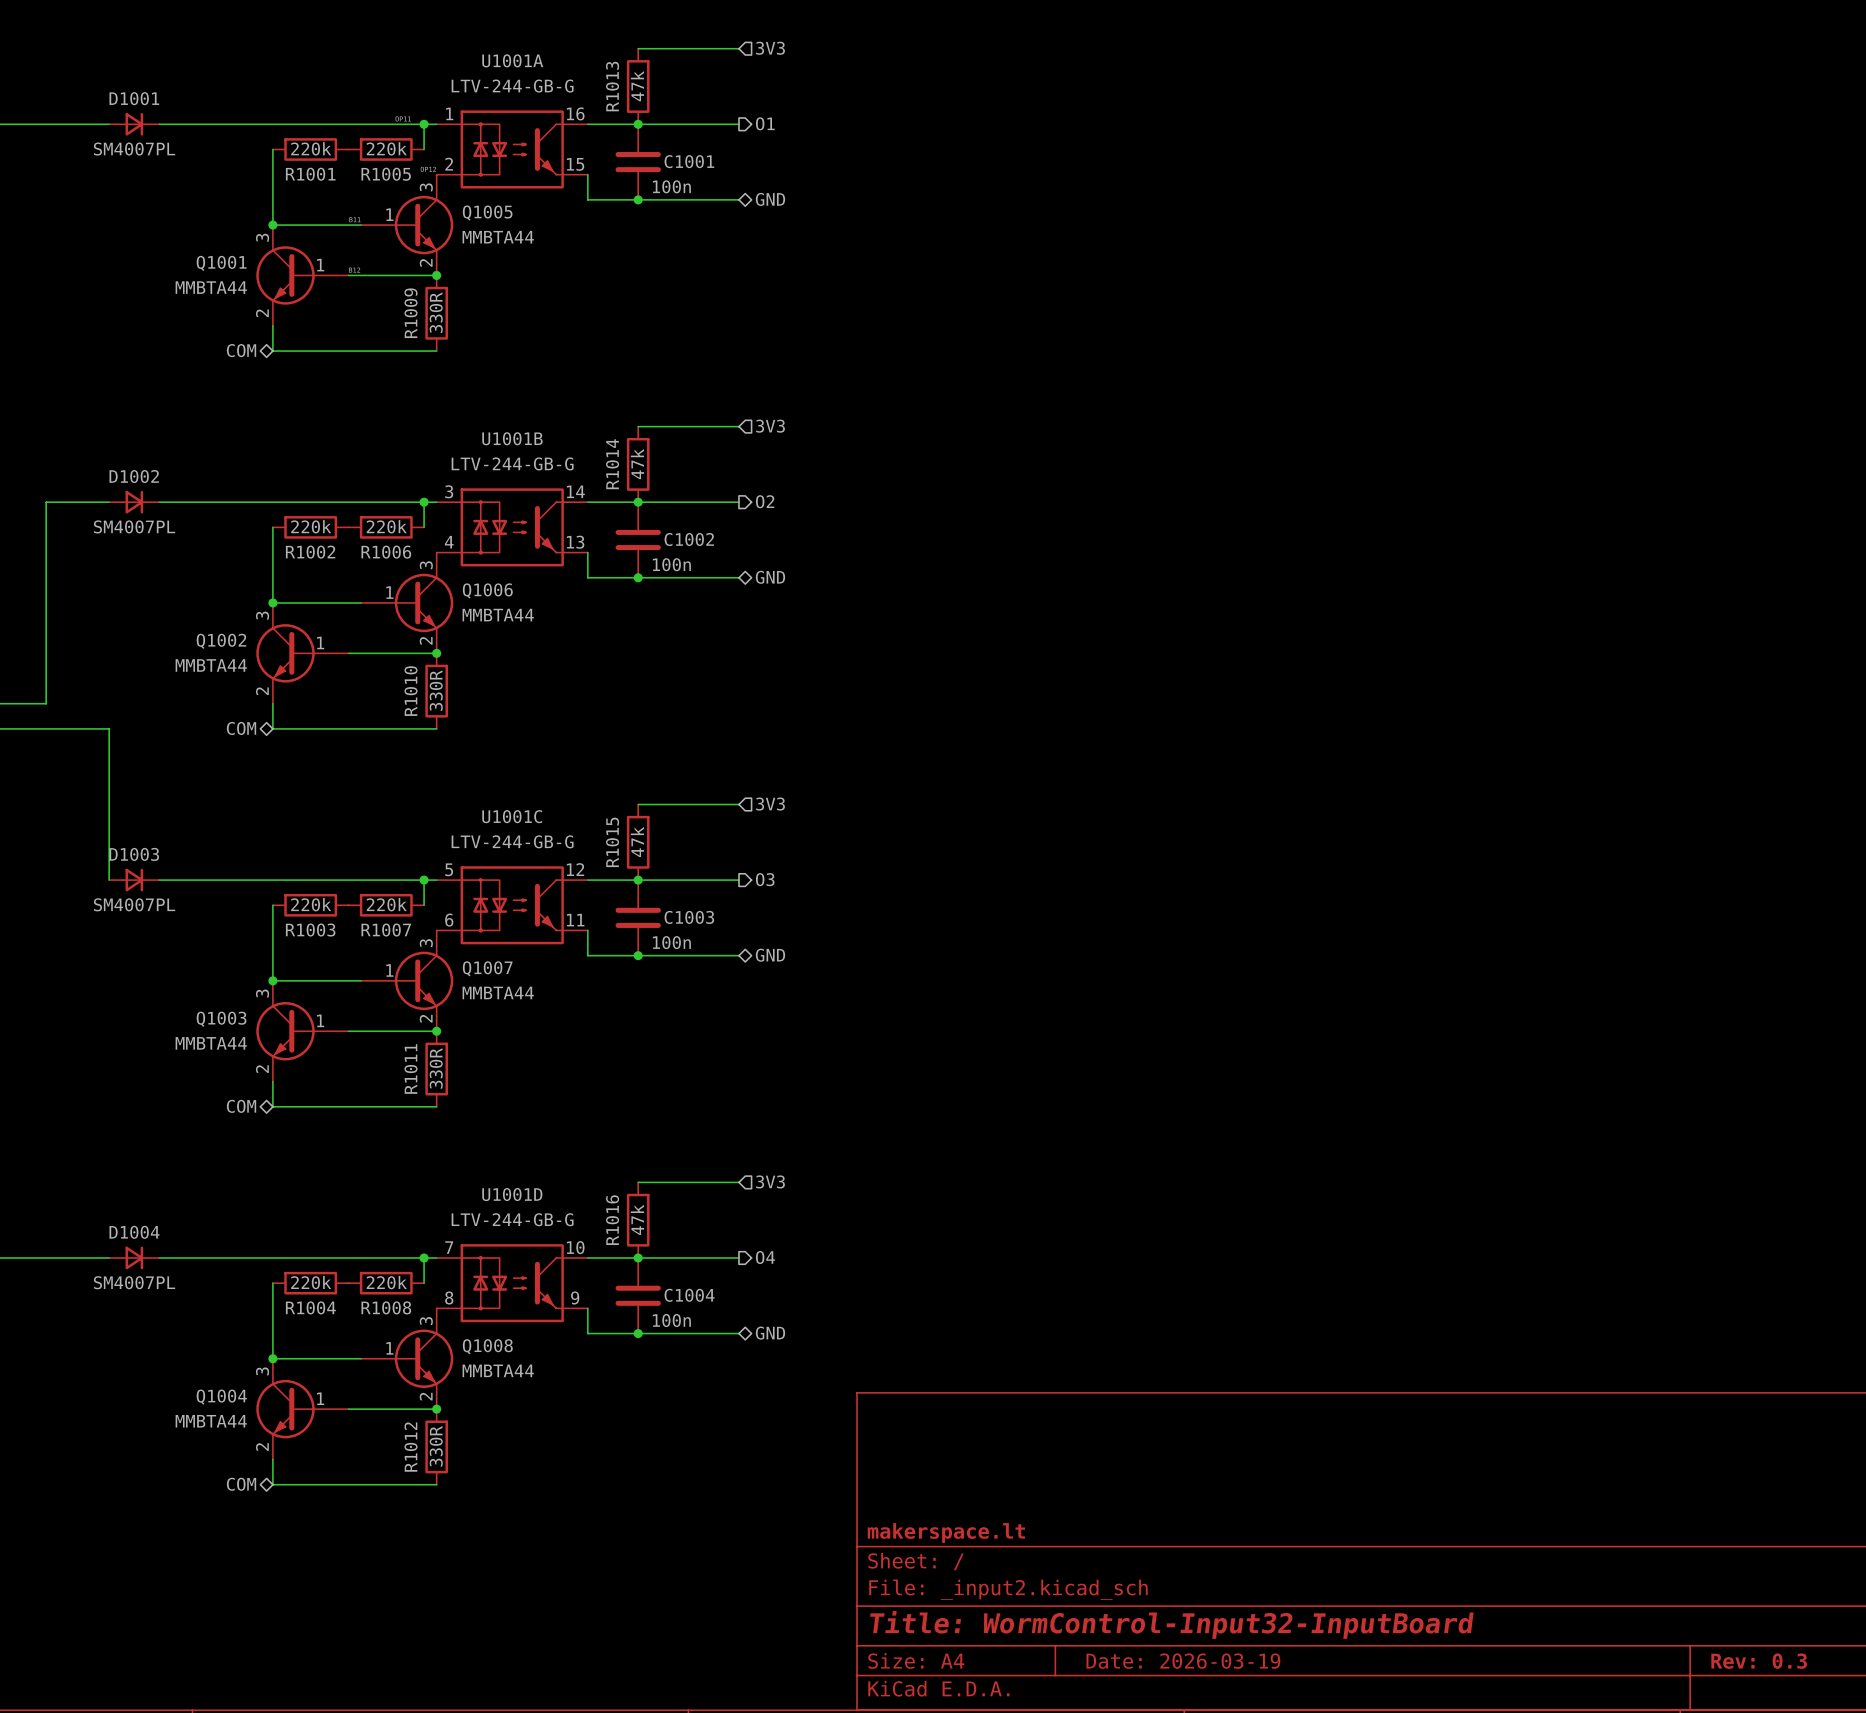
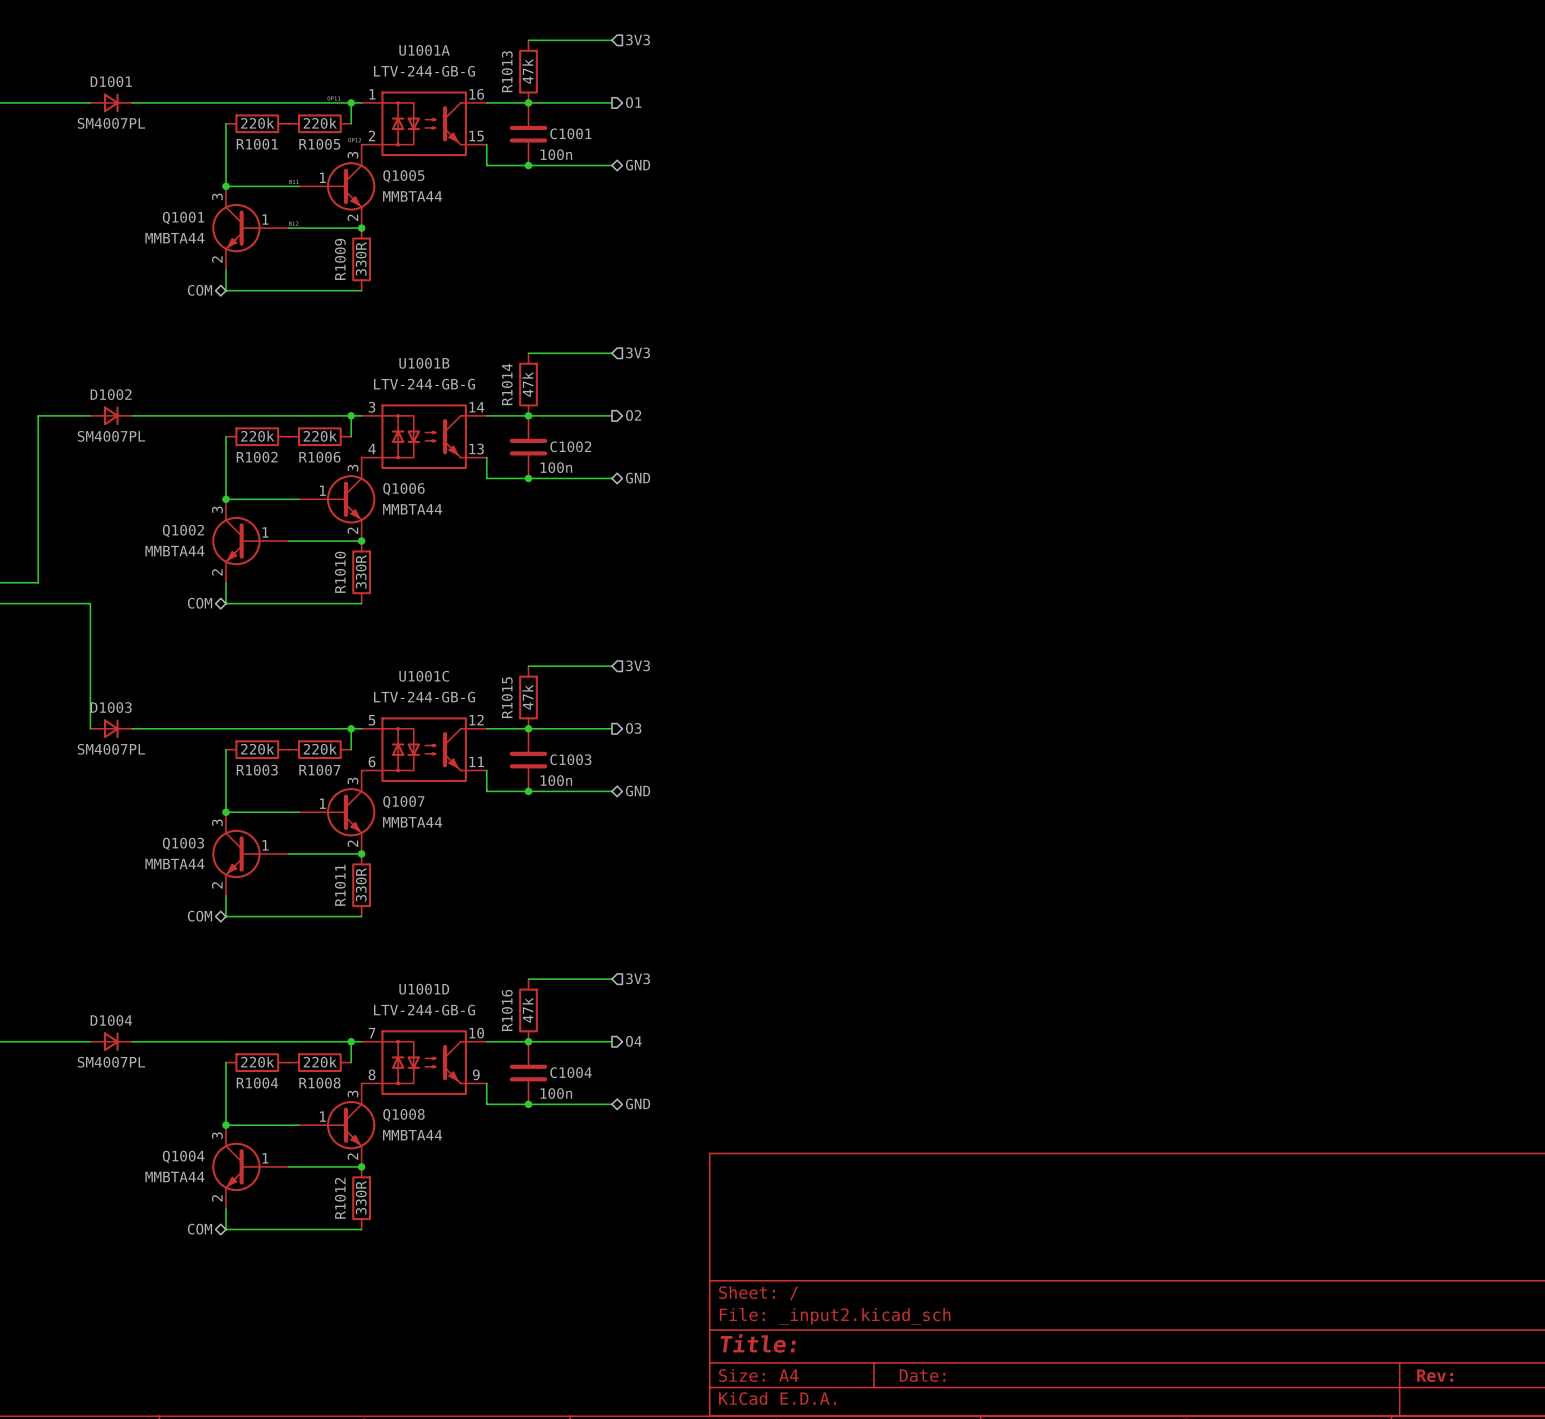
title block: makerspace.lt (946, 1532) -> none
title block: Title: WormControl-Input32-InputBoard (1171, 1624) -> Title: (758, 1343)
title block: Date: 2026-03-19 (1183, 1661) -> Date: (922, 1375)
title block: Rev: 0.3 (1759, 1661) -> Rev: (1435, 1375)

